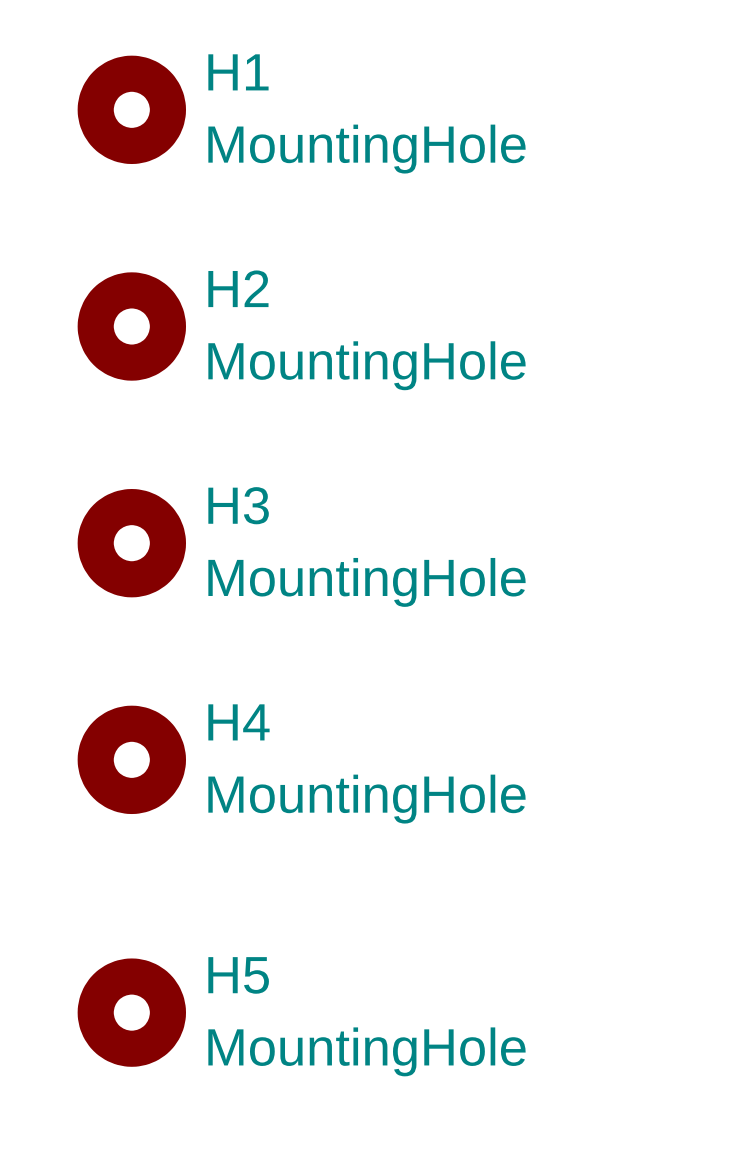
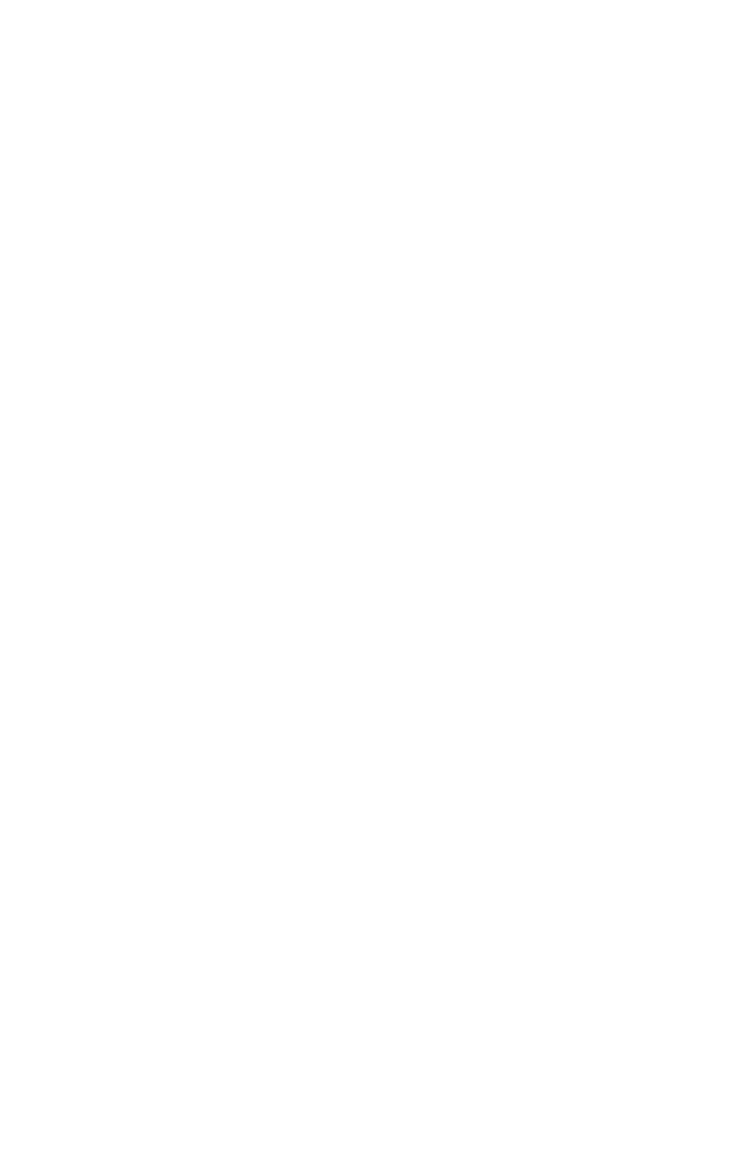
H1: MountingHole (131, 109) -> none
H2: MountingHole (131, 326) -> none
H3: MountingHole (131, 543) -> none
H4: MountingHole (131, 759) -> none
H5: MountingHole (131, 1012) -> none

